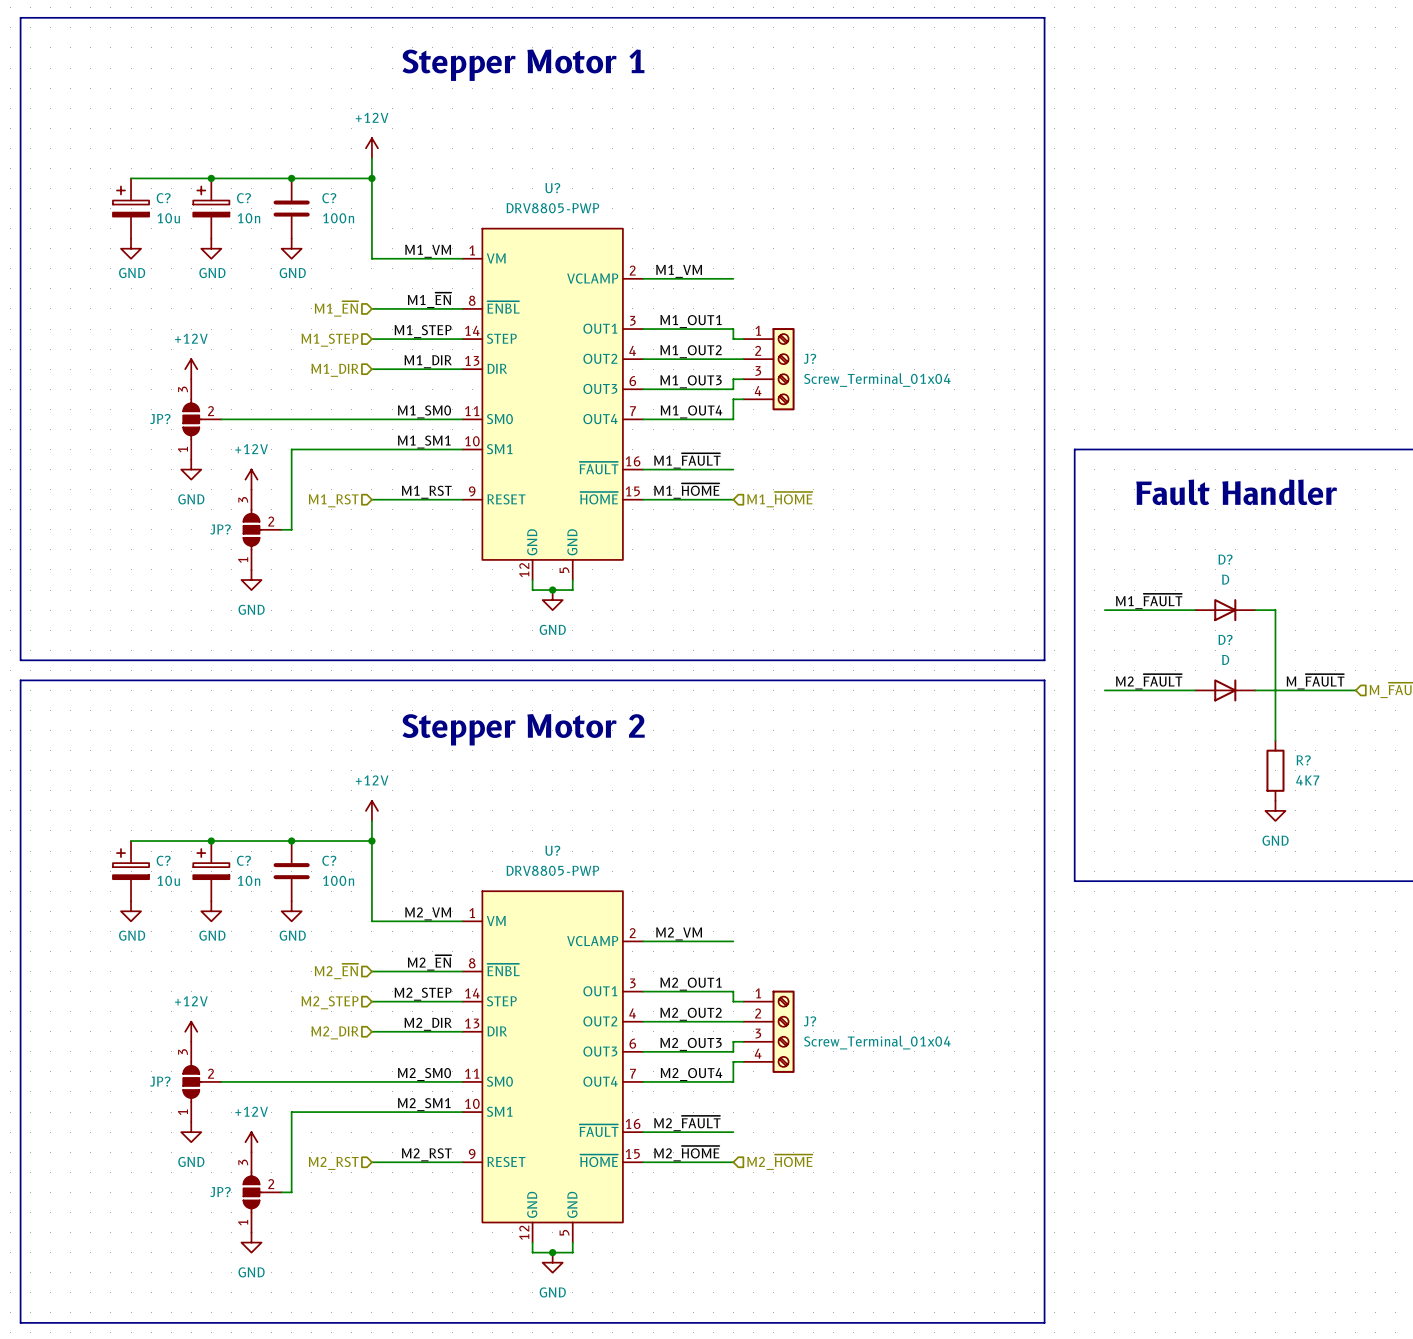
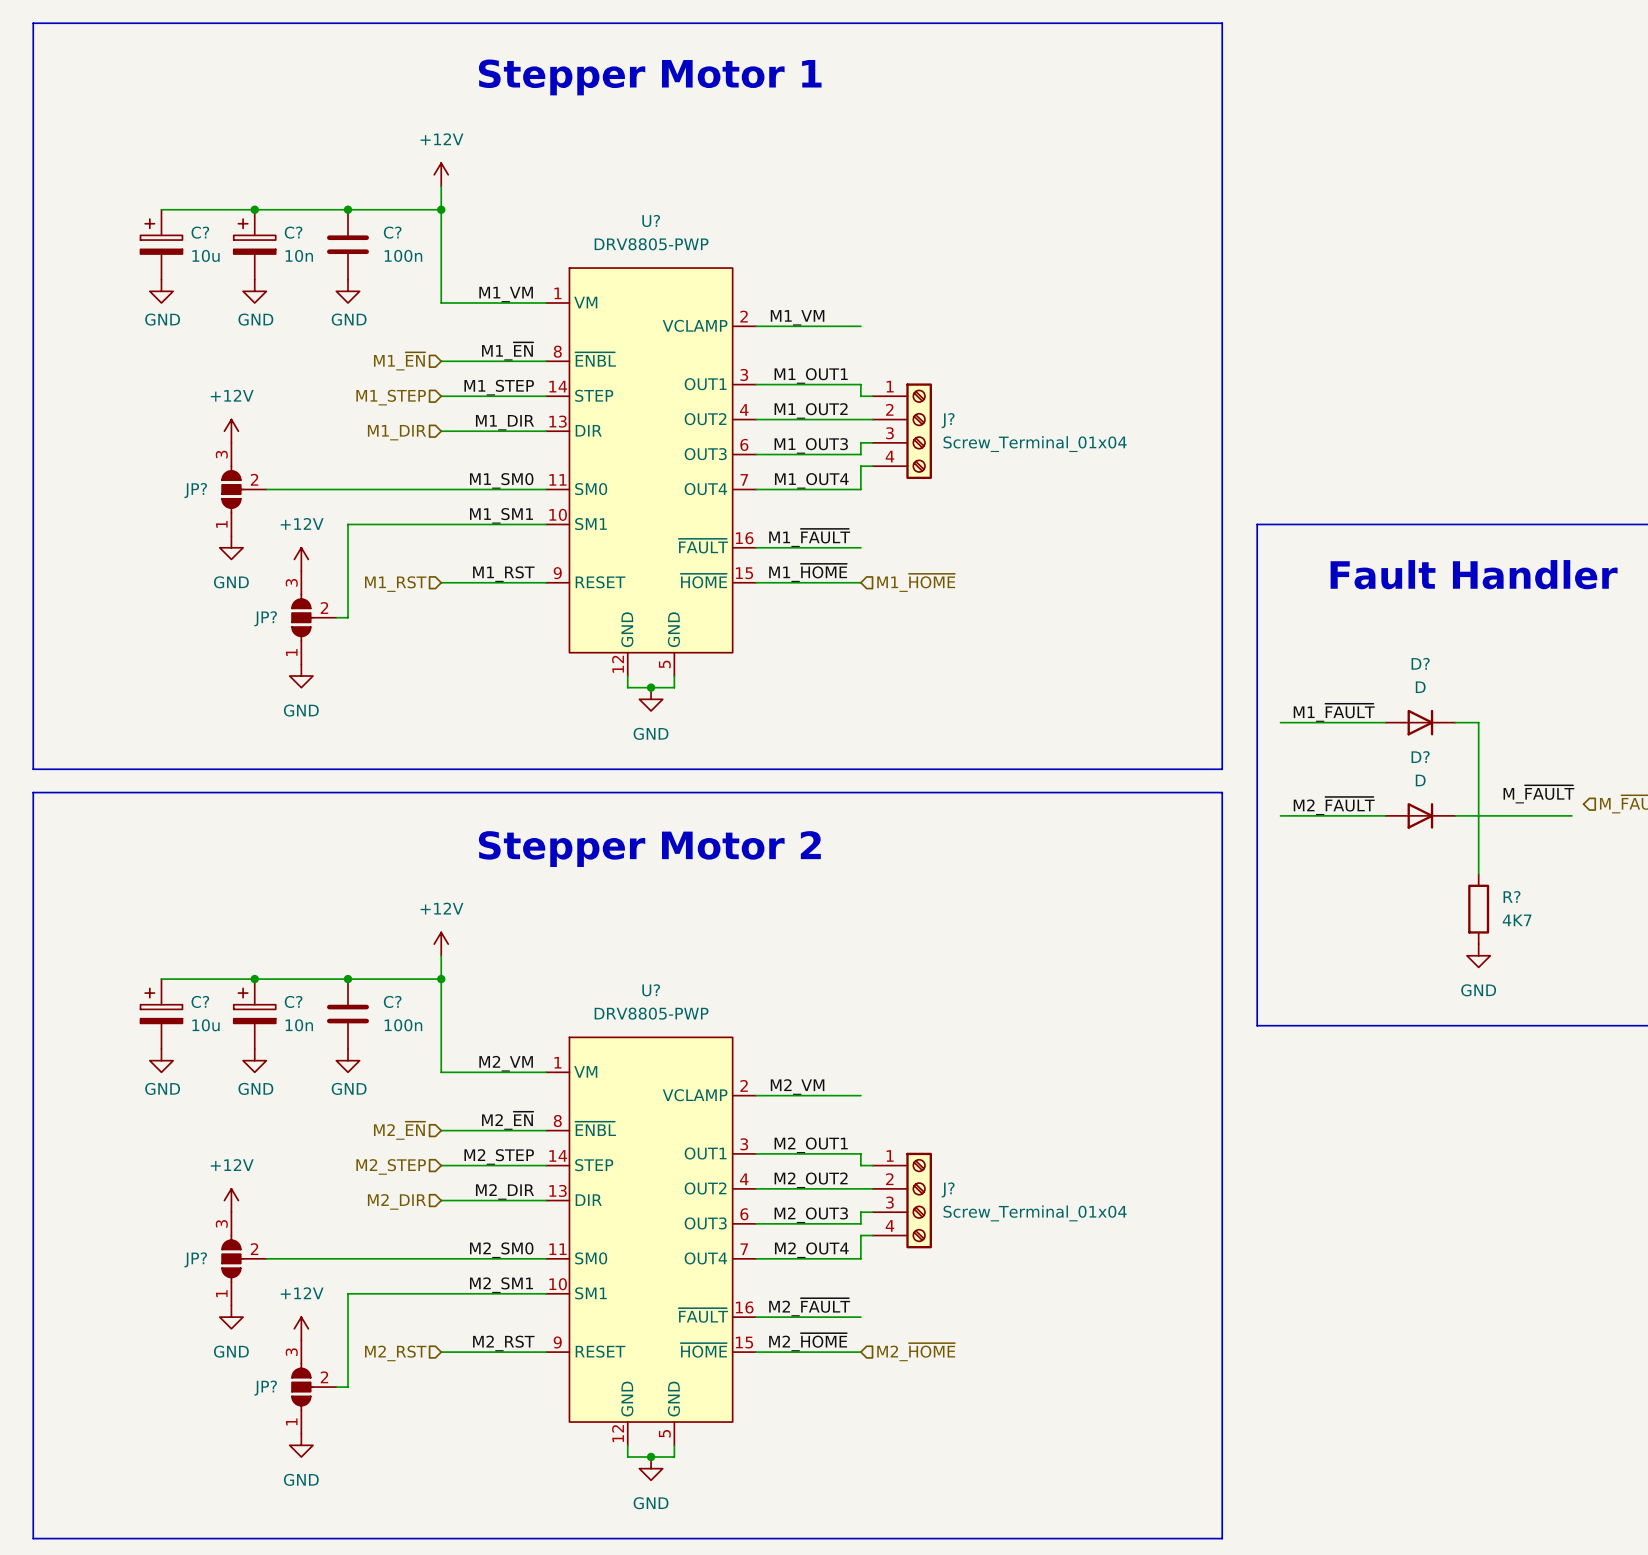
label position: M1_~{FAULT} (1149, 601) -> M1_~{FAULT} (1334, 712)
wire: (1104, 610) (1195, 610) -> (1280, 722) (1385, 722)
D? position: (1225, 610) -> (1420, 722)
wire: (1255, 610) (1275, 610) (1275, 740) -> (1455, 722) (1478, 722) (1478, 874)
label position: M2_~{FAULT} (1149, 681) -> M2_~{FAULT} (1334, 806)
wire: (1104, 690) (1195, 690) -> (1280, 815) (1385, 815)
D? position: (1225, 690) -> (1420, 815)
wire: (1255, 690) (1355, 690) -> (1455, 815) (1571, 815)
R? position: (1275, 770) -> (1478, 909)
power symbol position: GND (1275, 810) -> GND (1478, 955)

